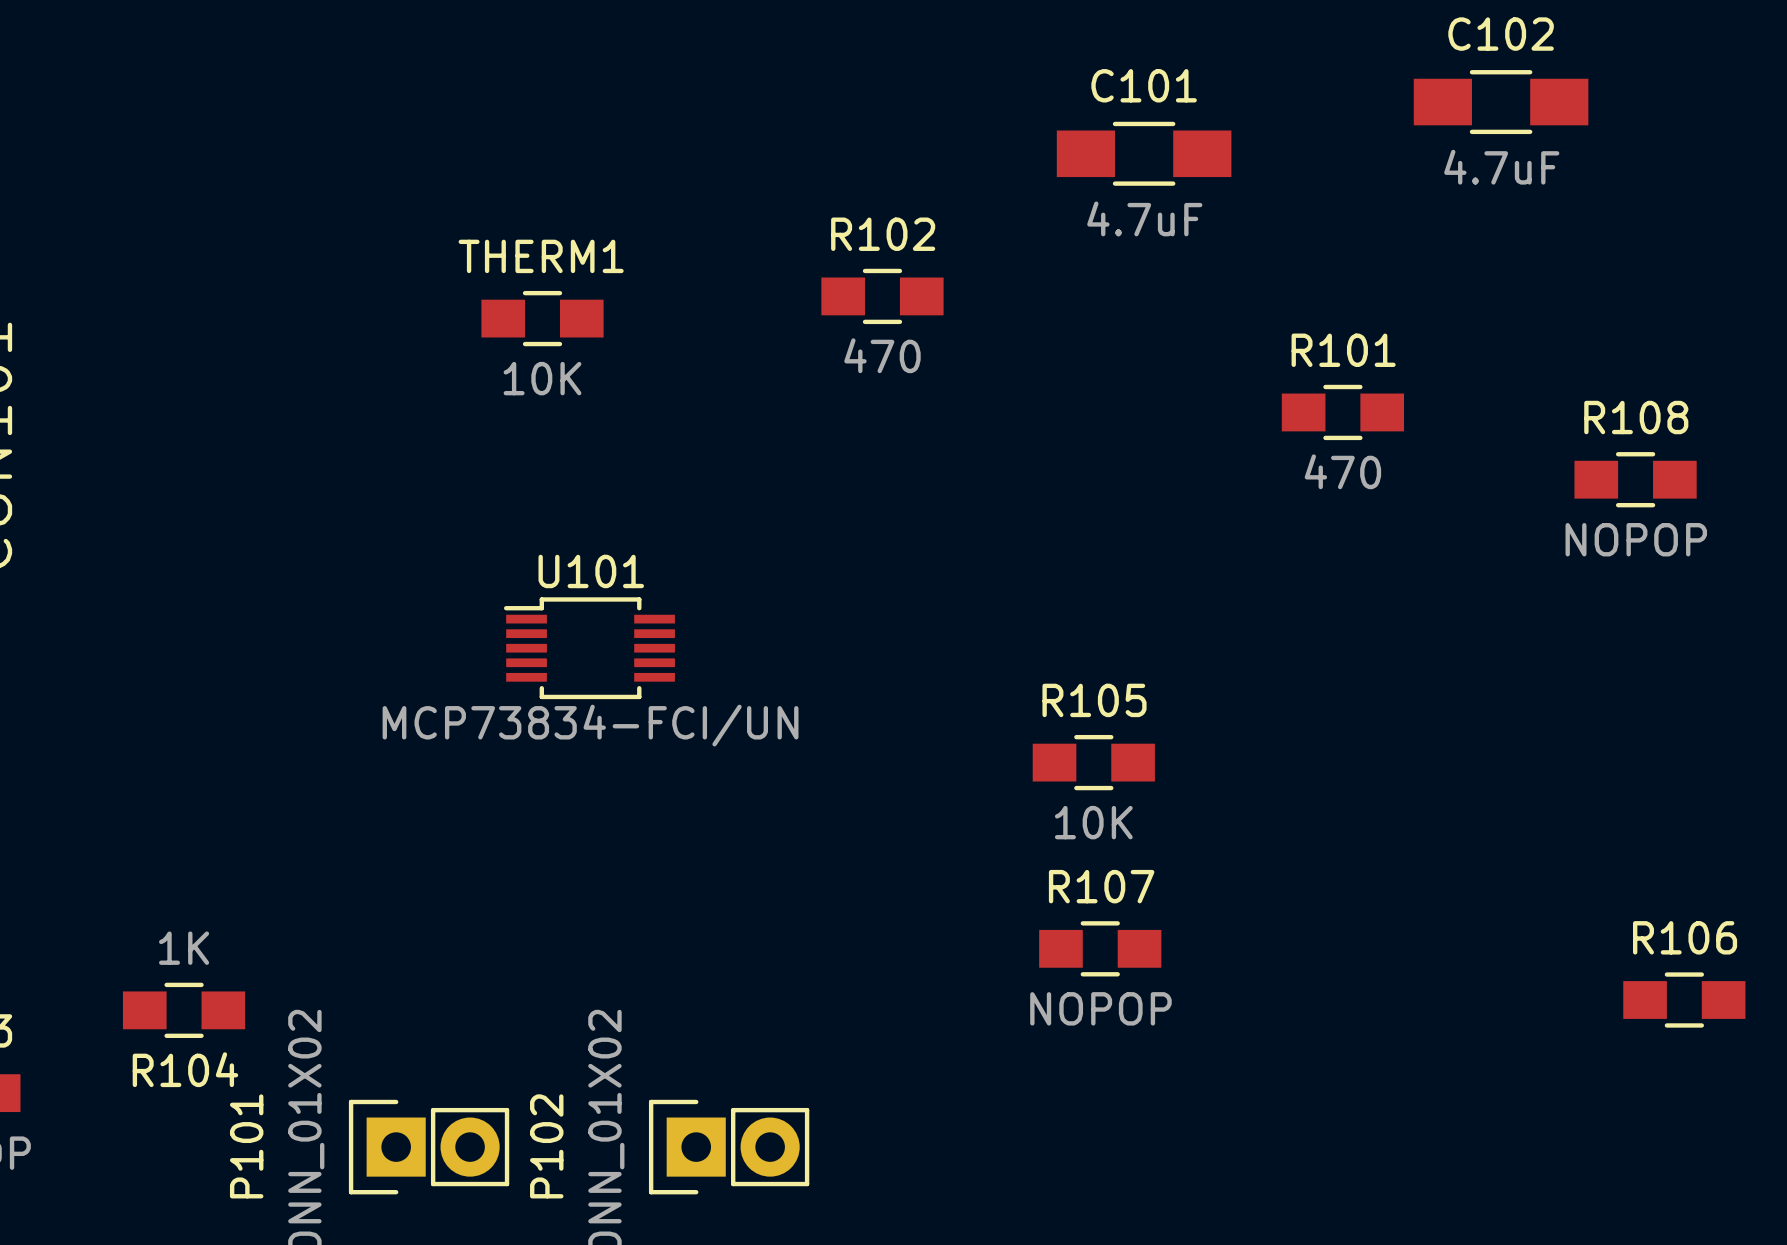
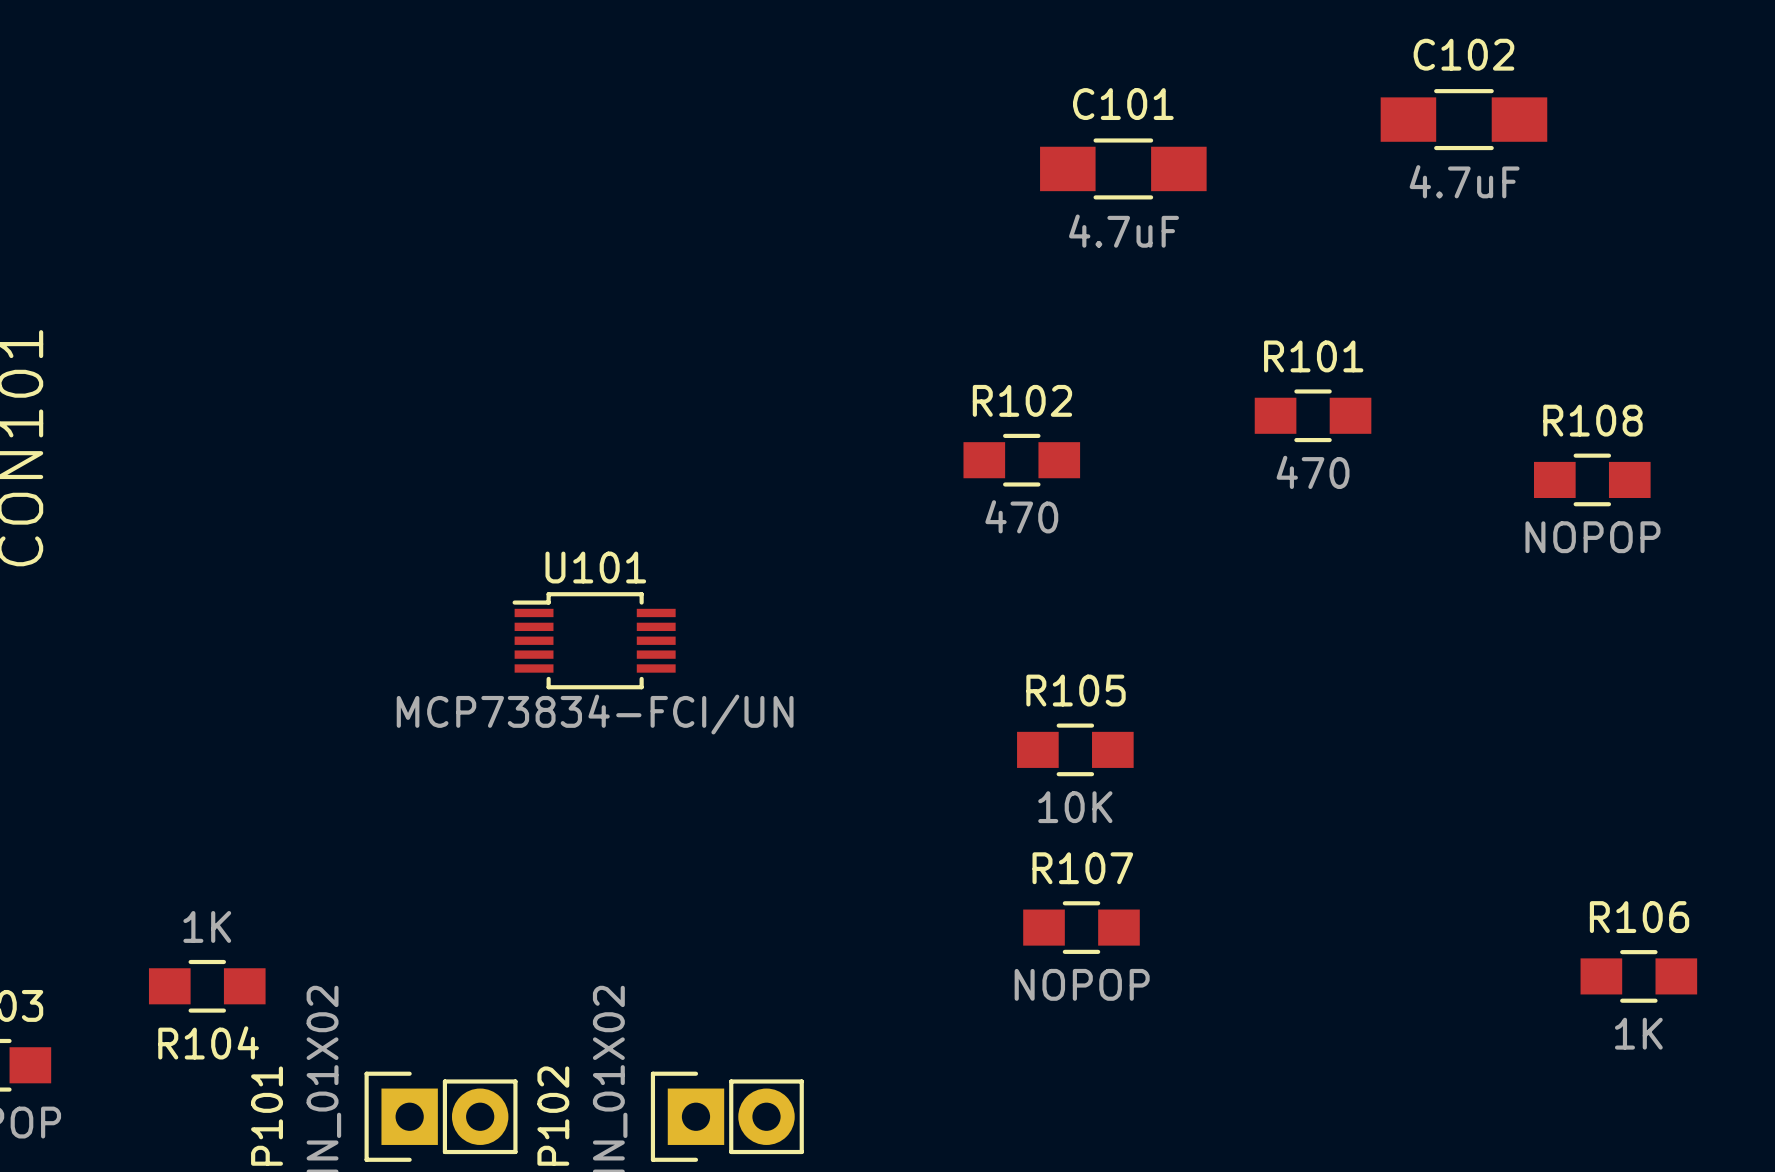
R102 position: (882, 296) -> (1021, 460)
THERM1: 10K (542, 318) -> none
R106 value: none -> 1K (1638, 1033)

